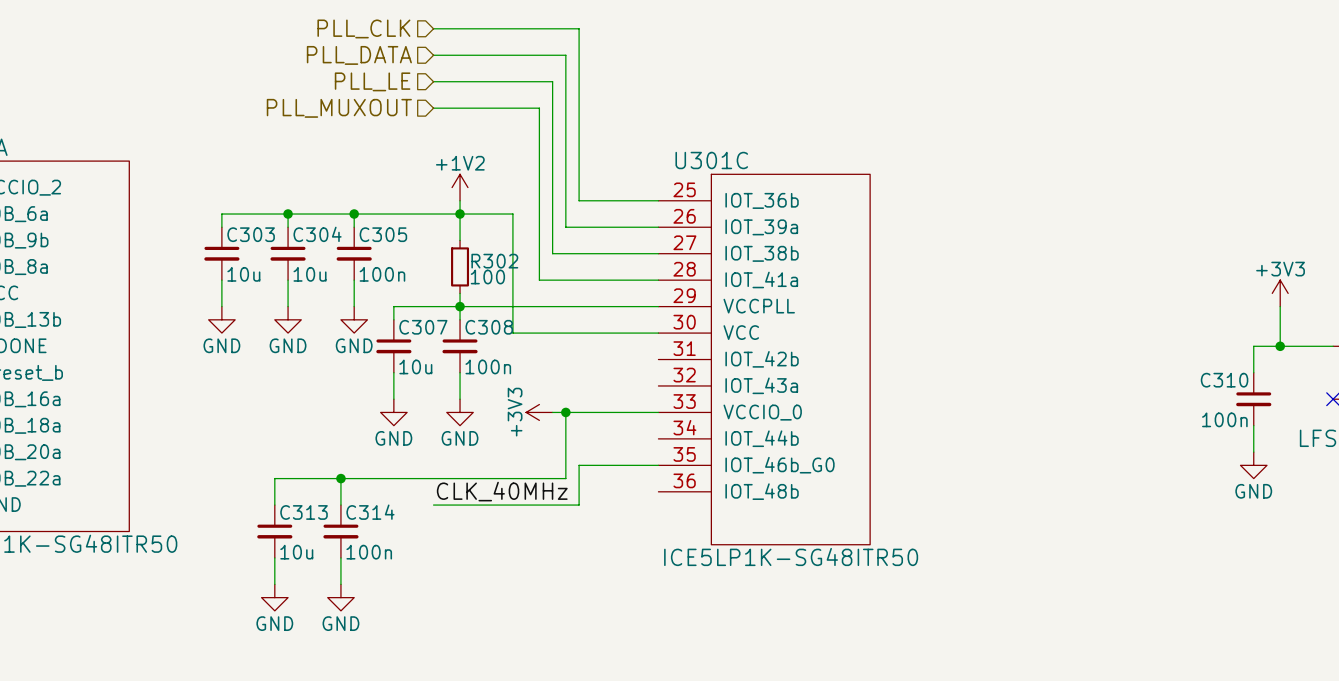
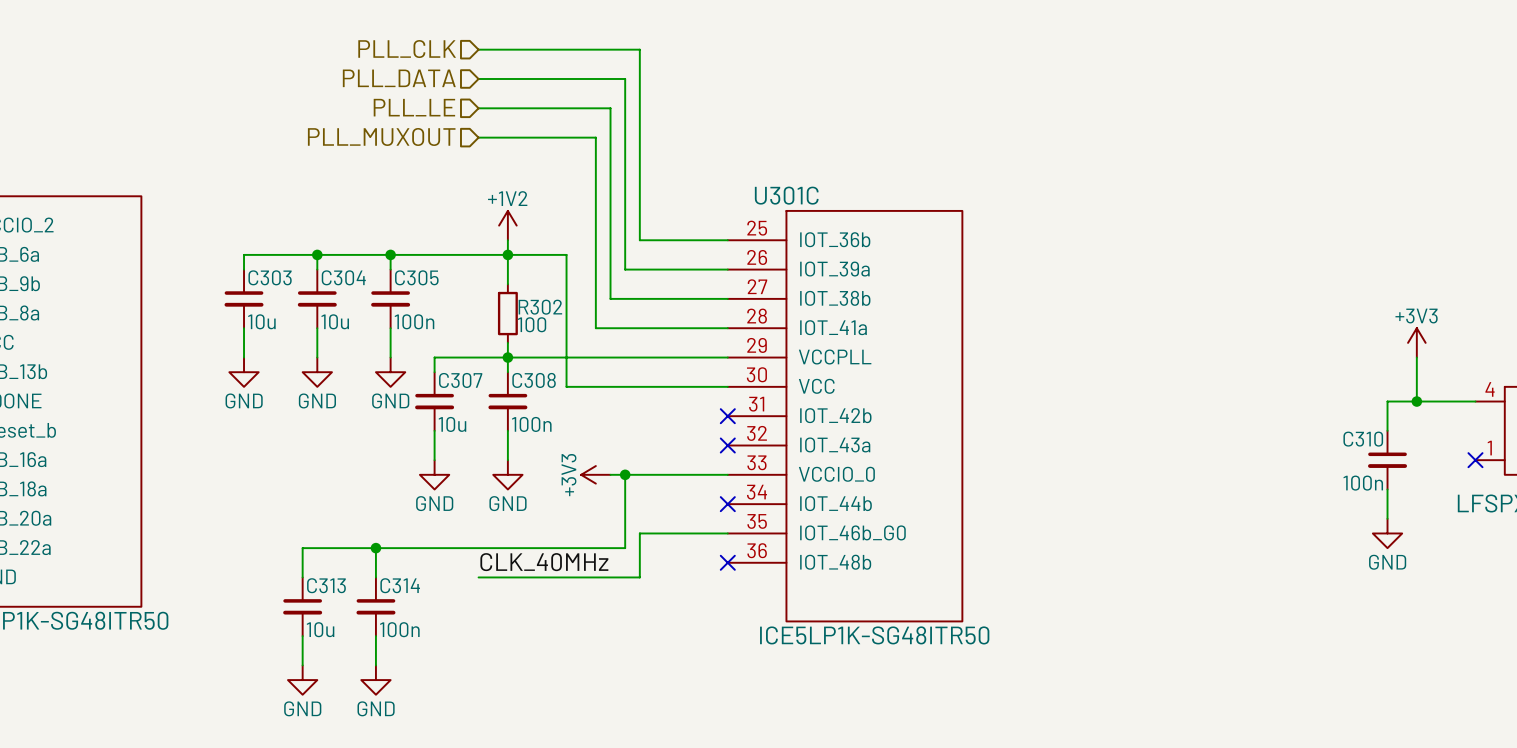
no-connect mark: none -> (727, 416)
no-connect mark: none -> (727, 445)
no-connect mark: none -> (727, 504)
no-connect mark: none -> (727, 562)

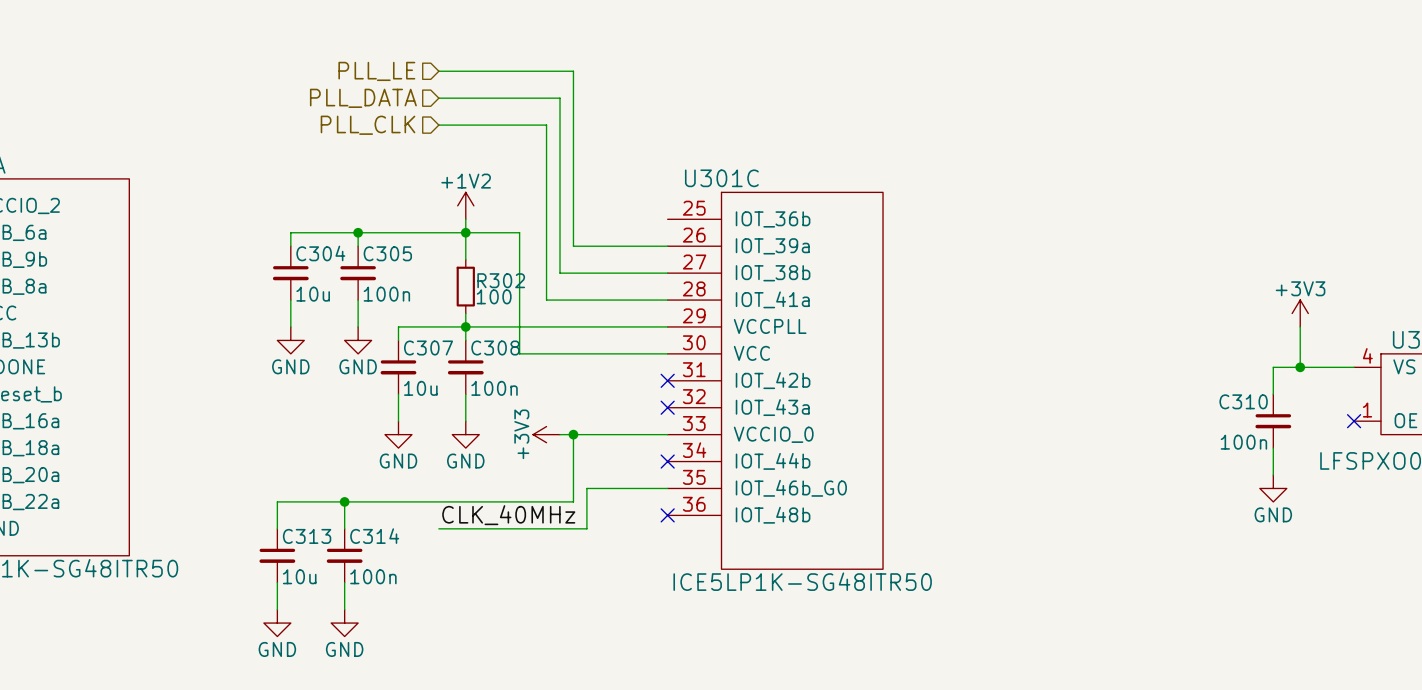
hierarchical label: PLL_CLK (407, 49) -> none
wire: (478, 49) (639, 49) (639, 240) (727, 240) -> none
hierarchical label: PLL_DATA (399, 78) -> PLL_LE (376, 71)
hierarchical label: PLL_LE (414, 107) -> PLL_DATA (363, 98)
hierarchical label: PLL_MUXOUT (381, 136) -> PLL_CLK (368, 125)
wire: (317, 254) (244, 254) (244, 269) -> none
junction: (317, 254) -> none
C303: 10u (244, 298) -> none
wire: (244, 328) (244, 357) -> none
power symbol: GND (244, 372) -> none

